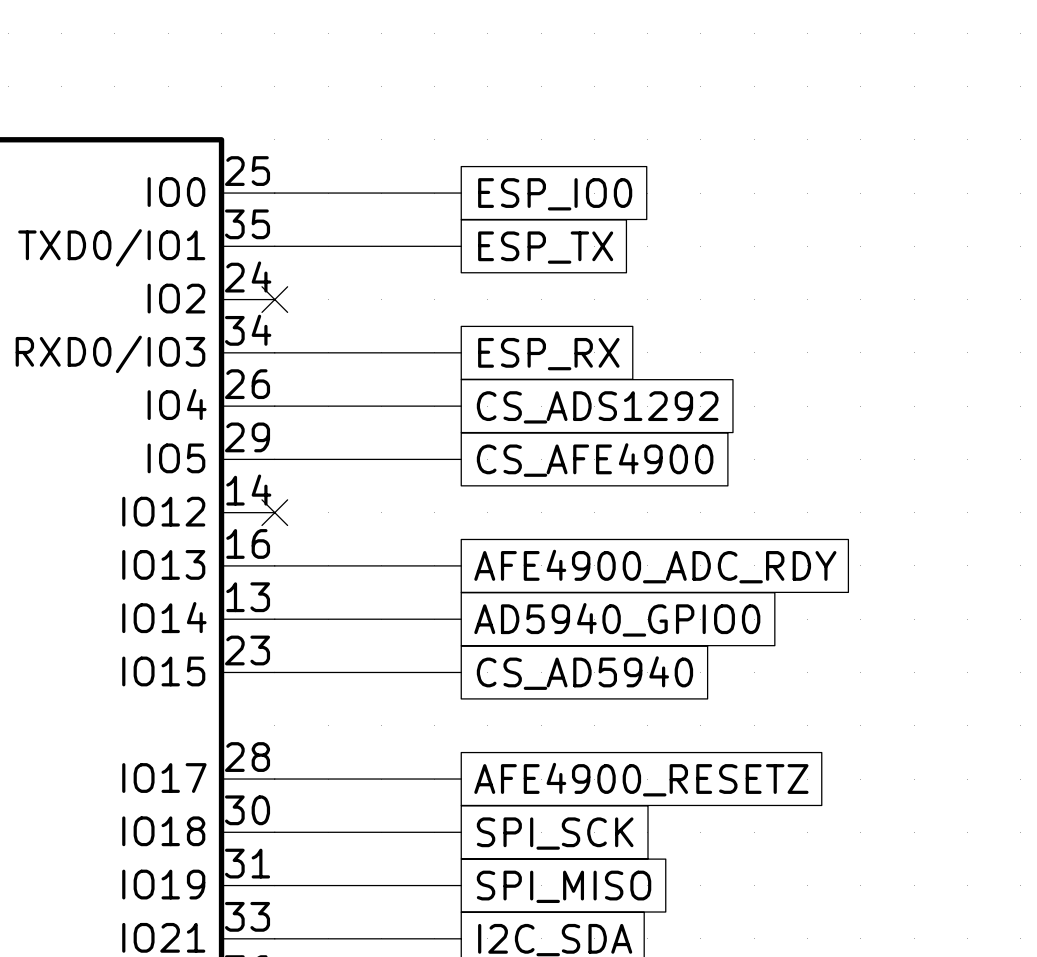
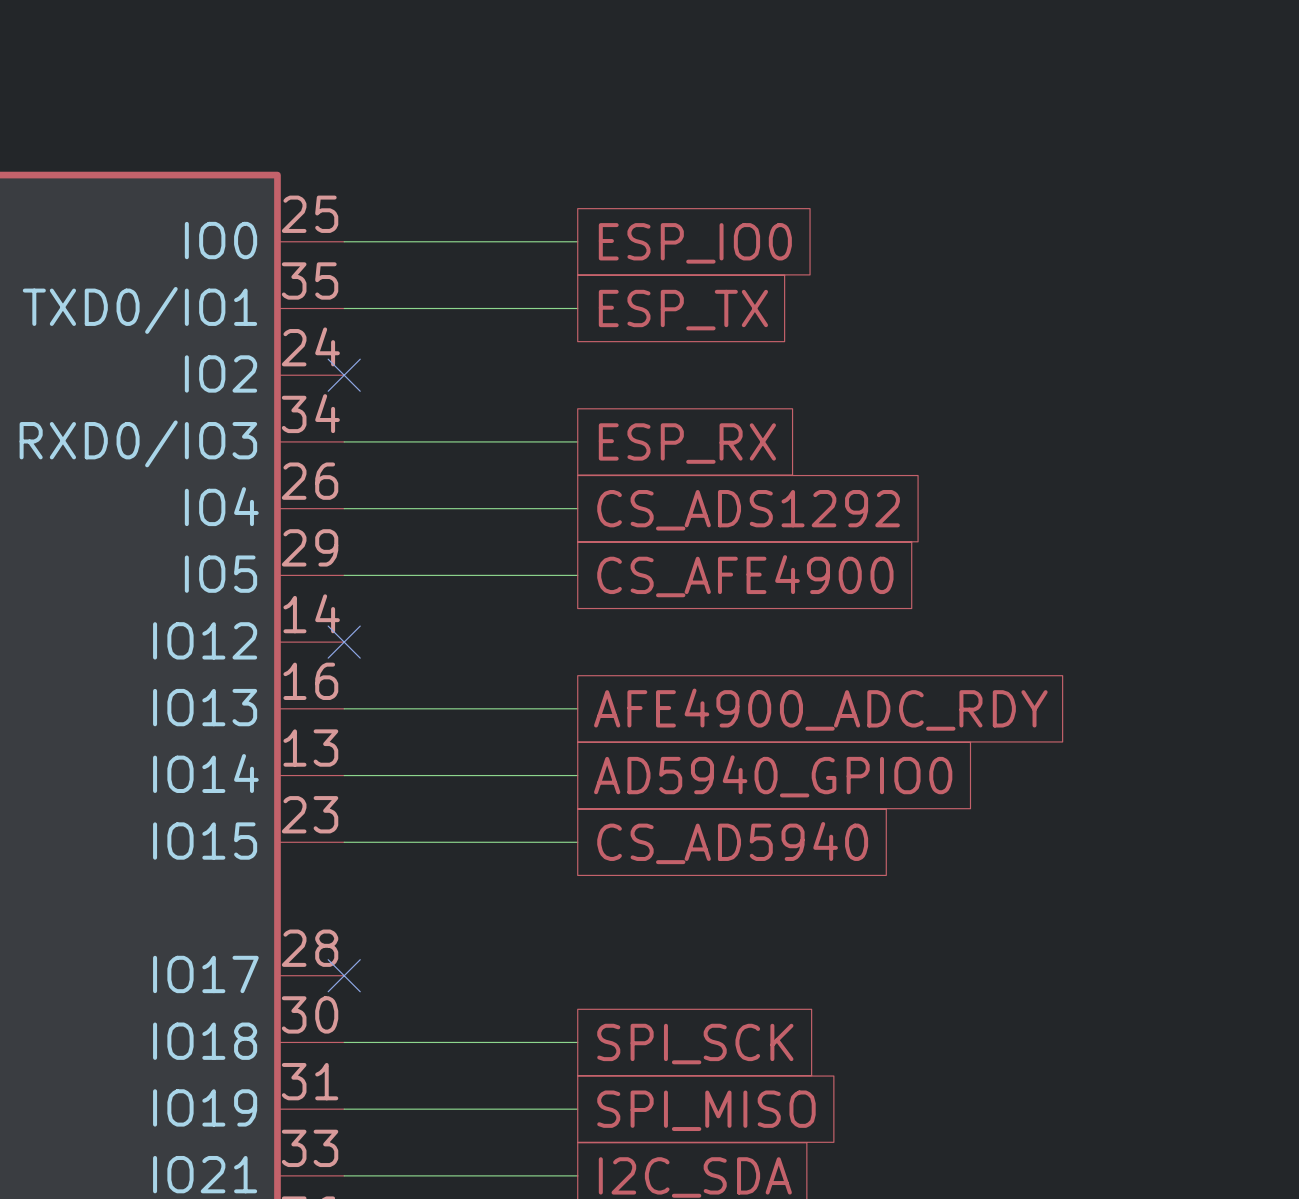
wire: (274, 779) (461, 779) -> none
no-connect mark: none -> (344, 975)
global label: AFE4900_RESETZ (641, 779) -> none

